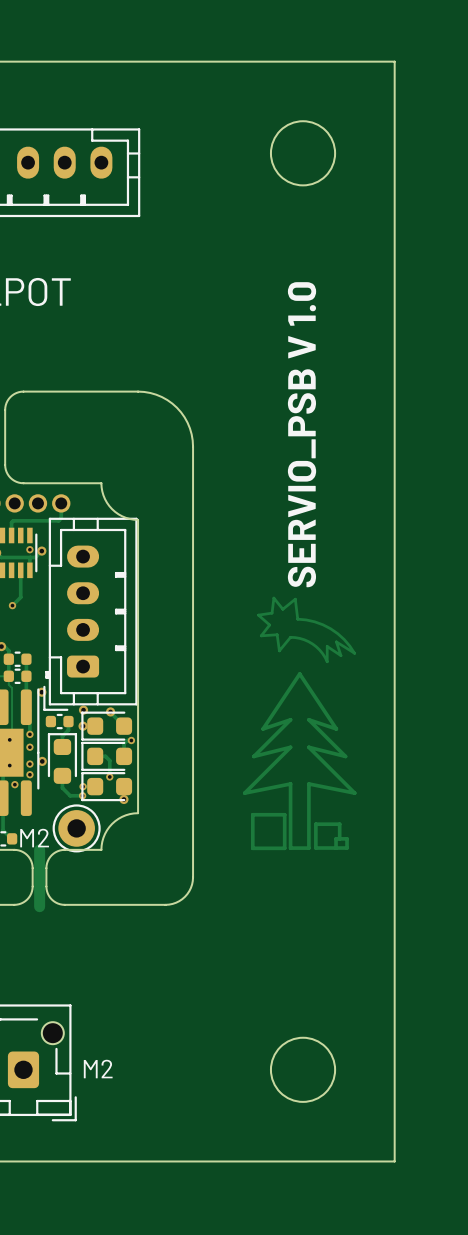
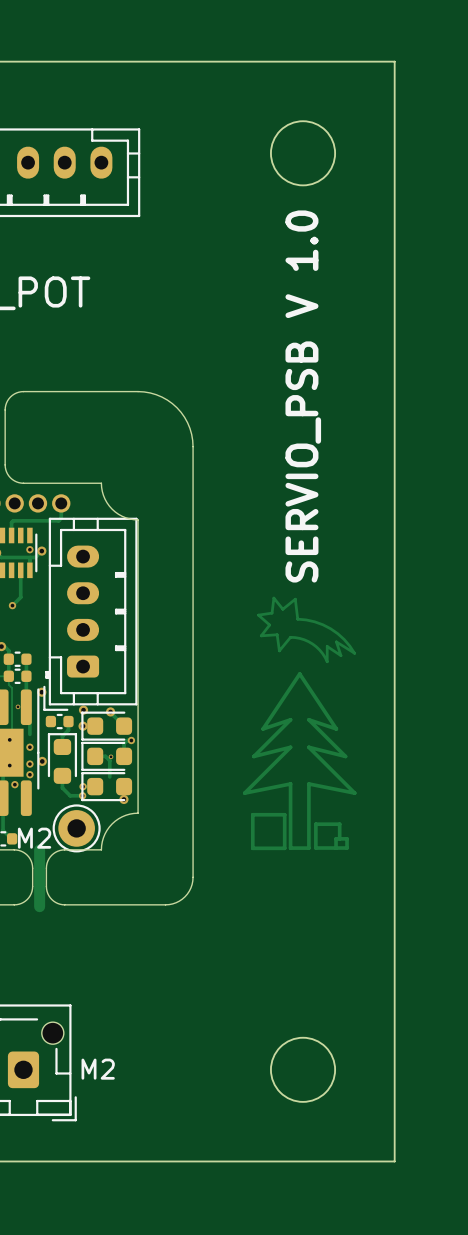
via: none -> (17, 706)
via: (29, 734) -> none
via: none -> (111, 756)
via: (109, 776) -> none

